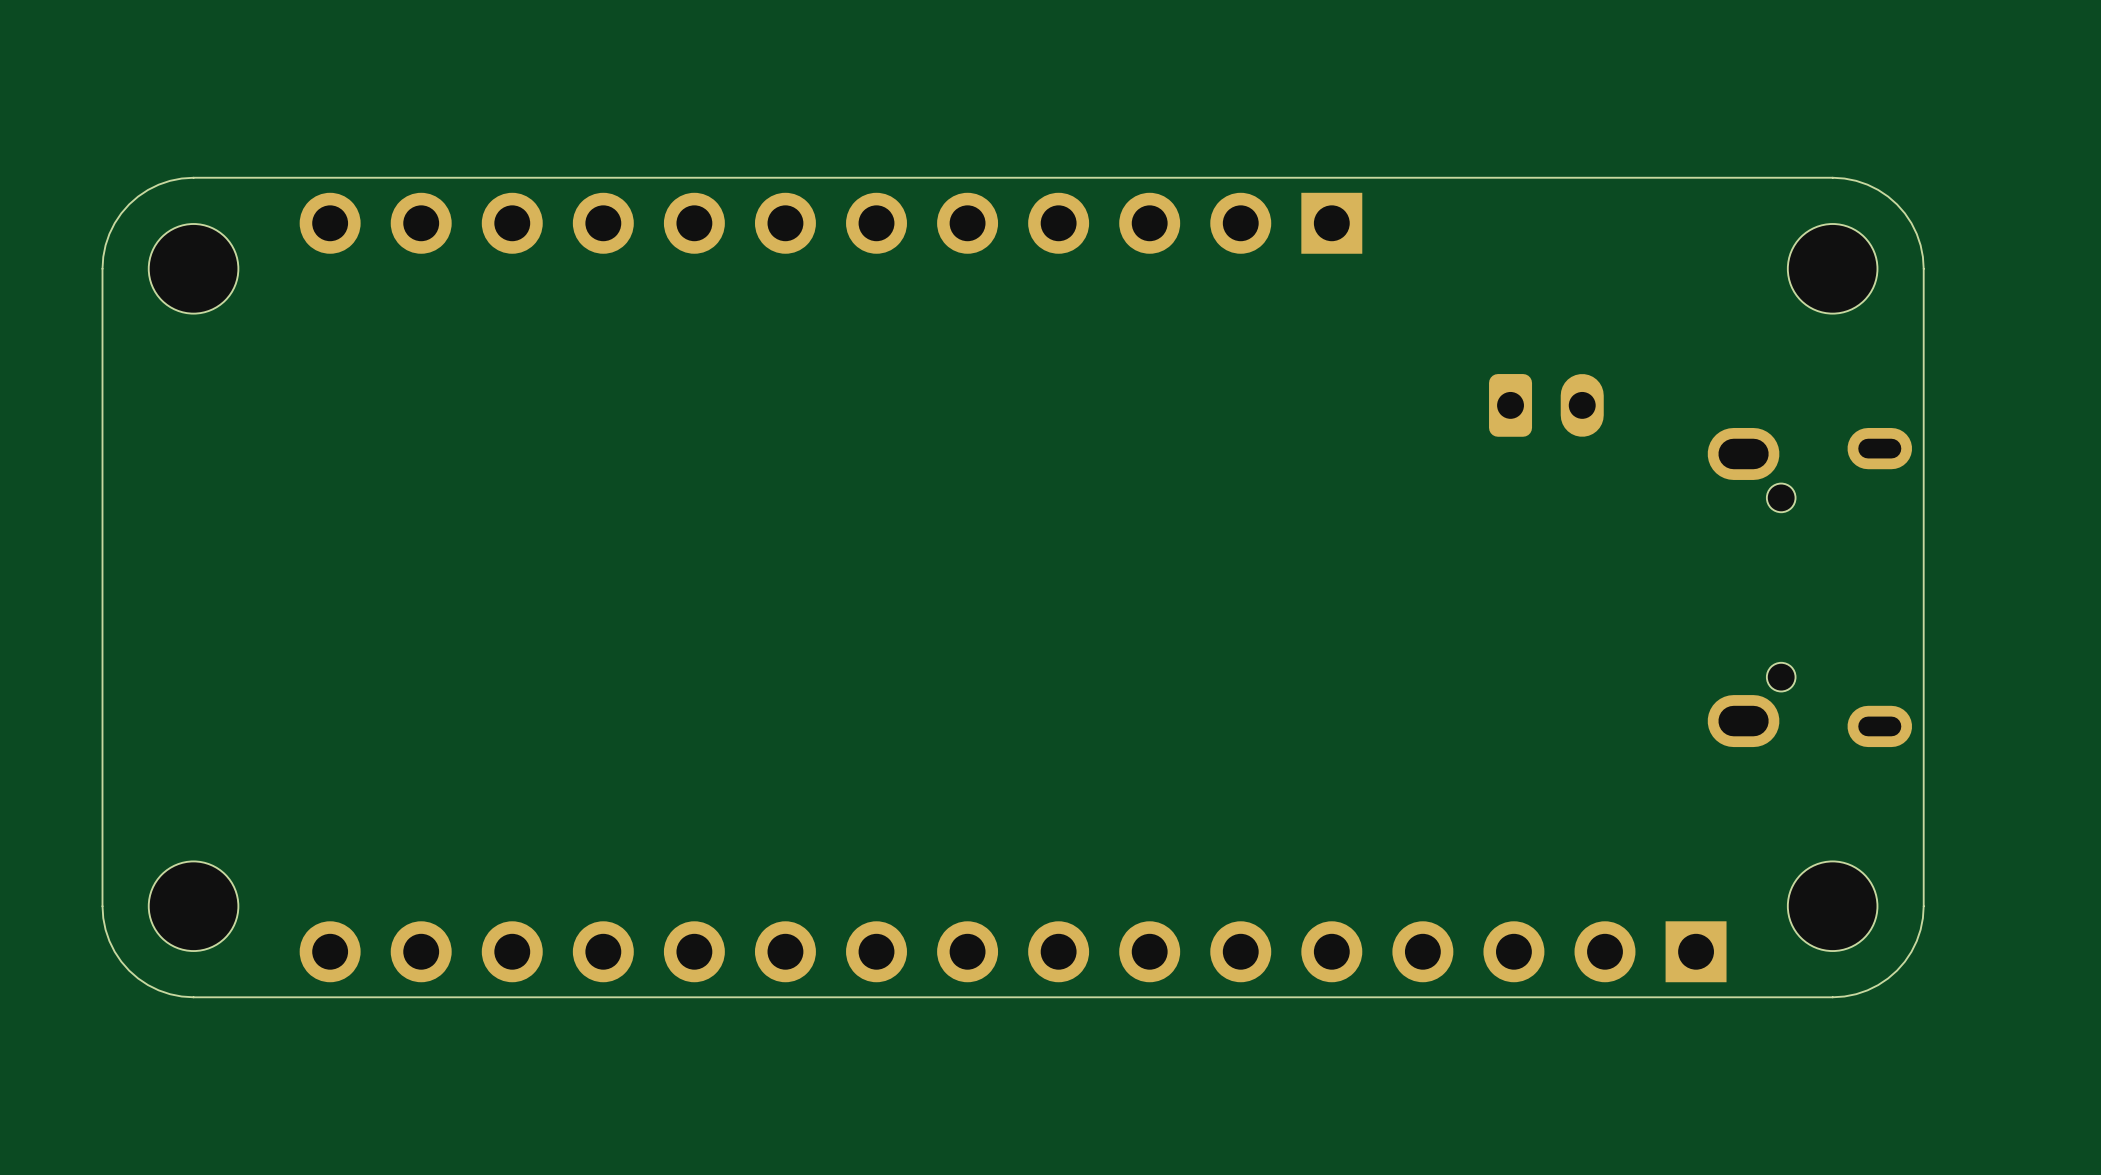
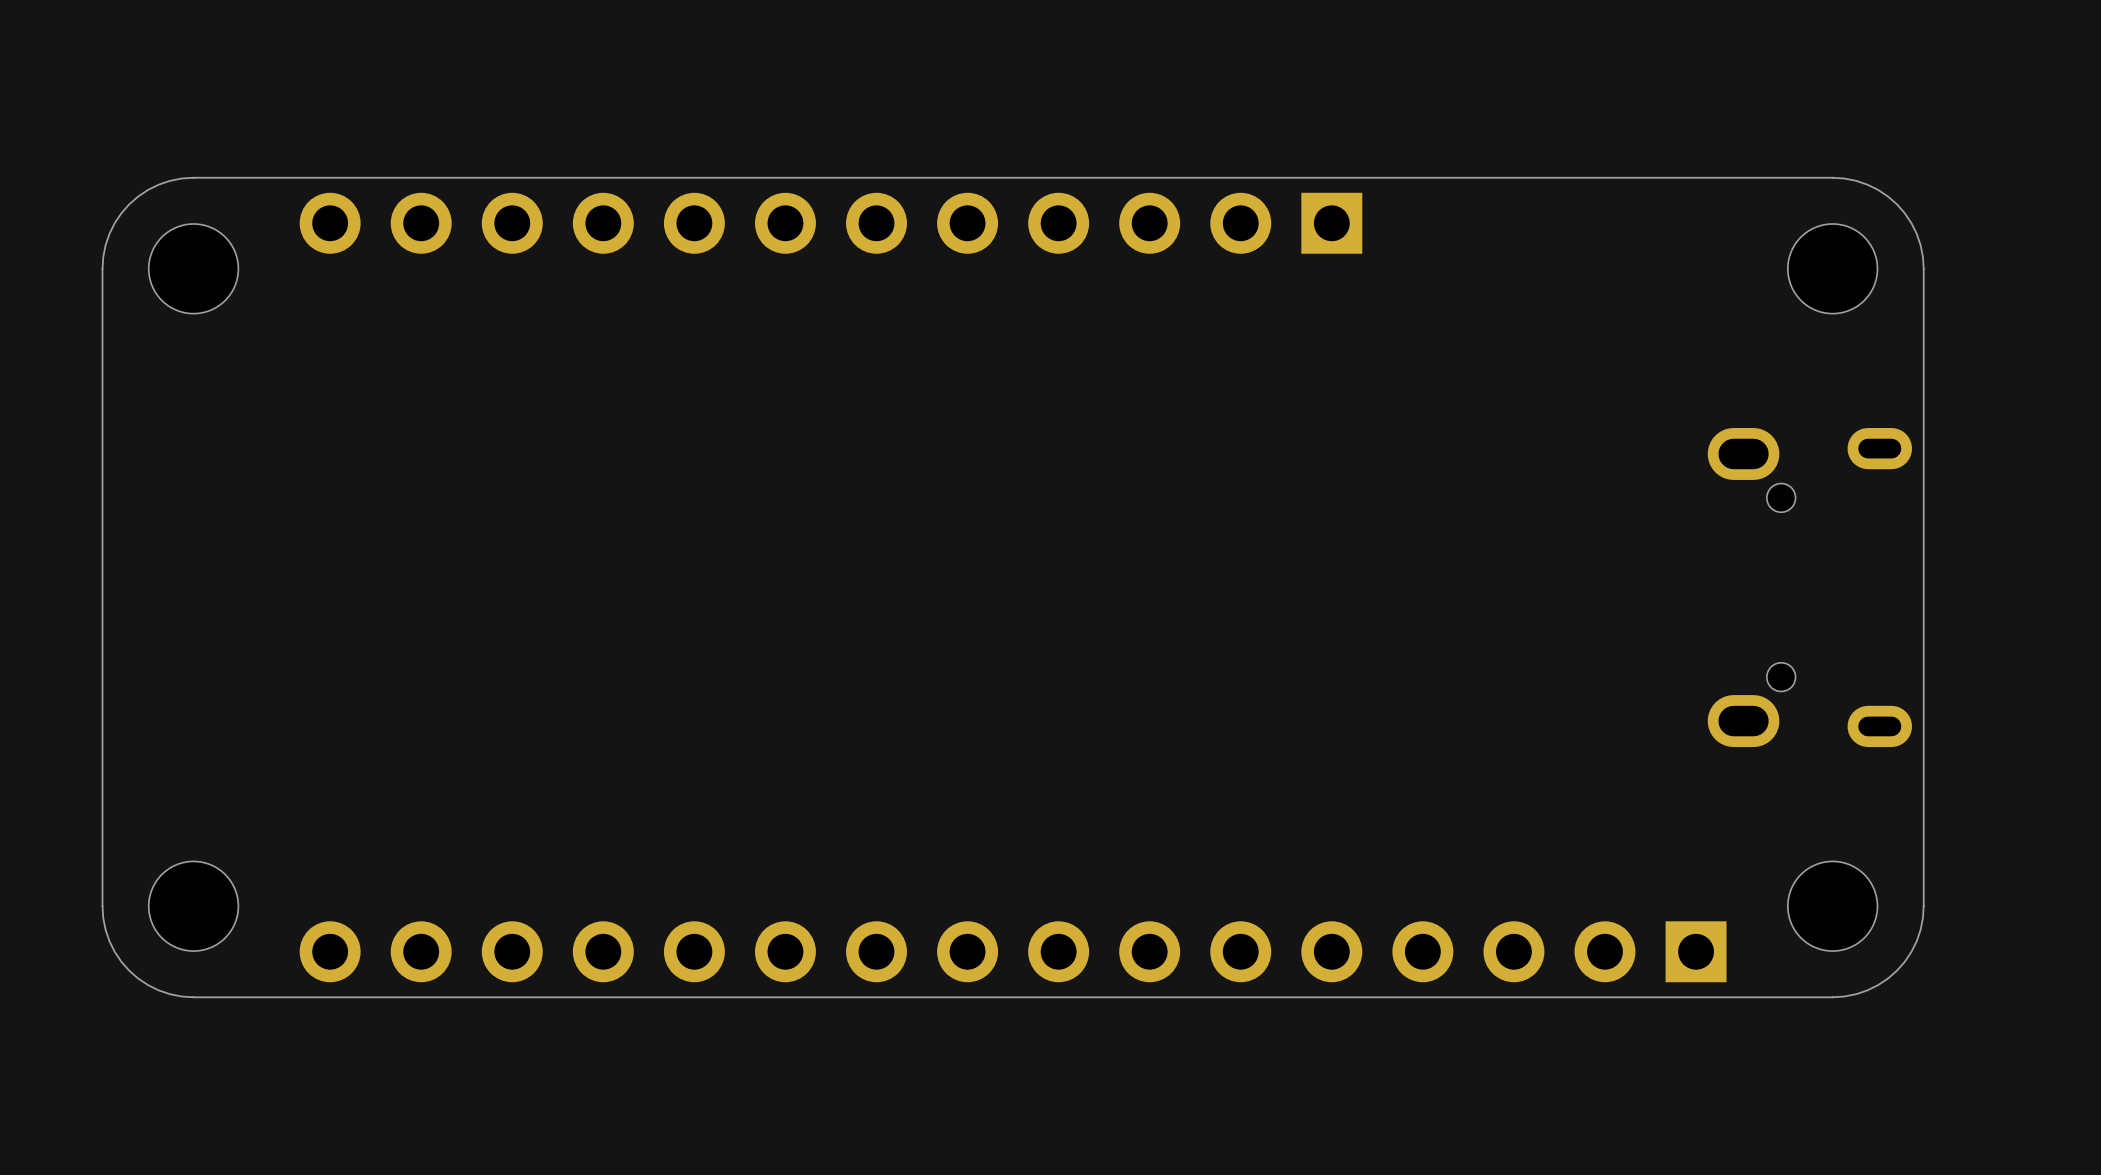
part: (1546, 405) -> none

